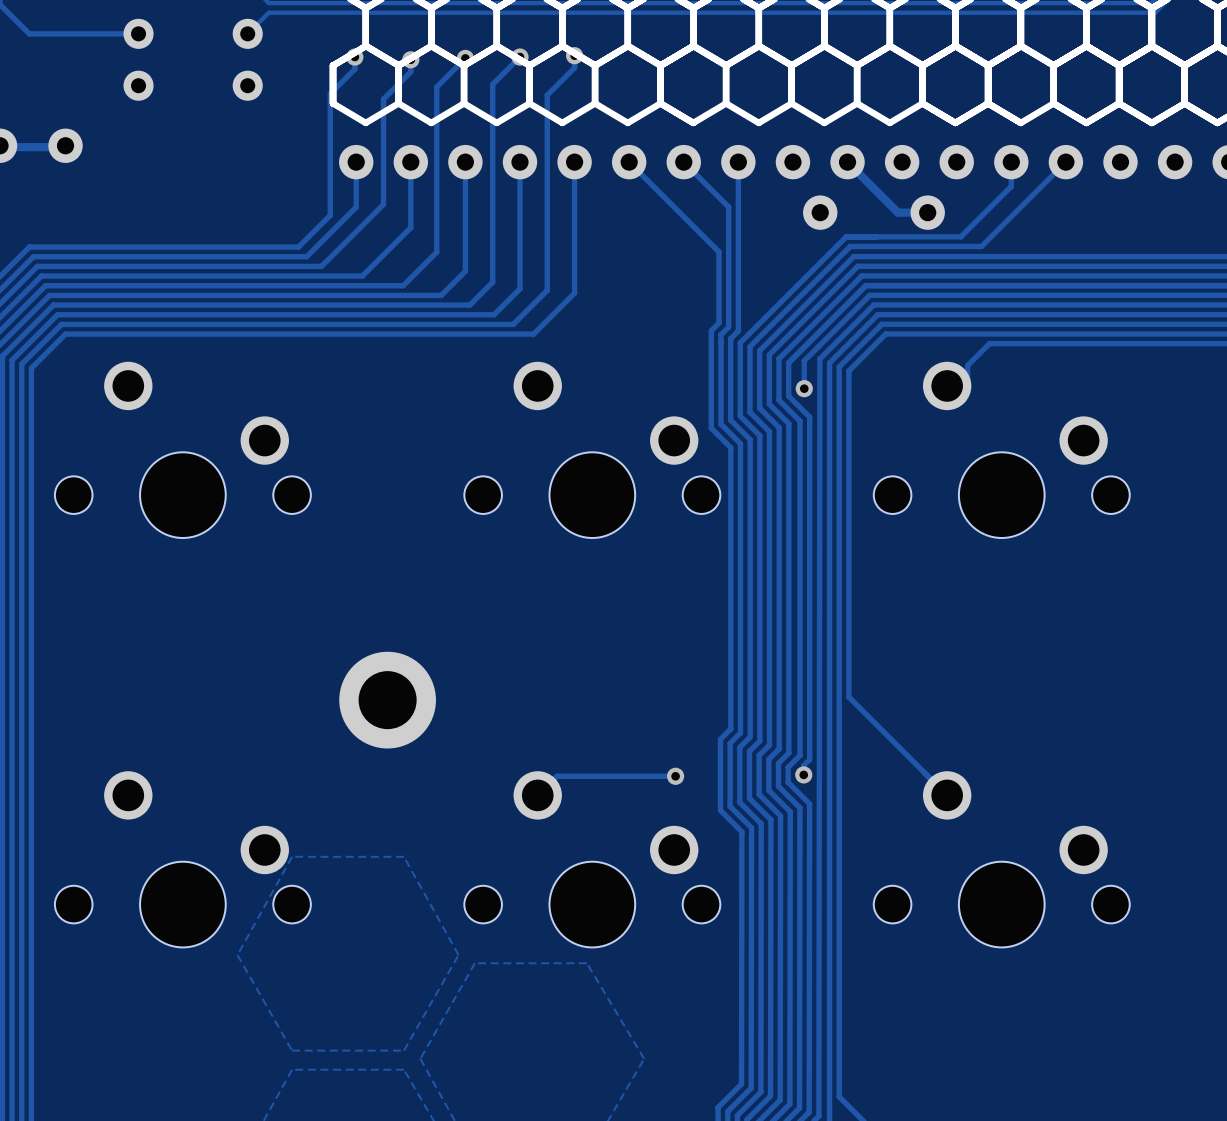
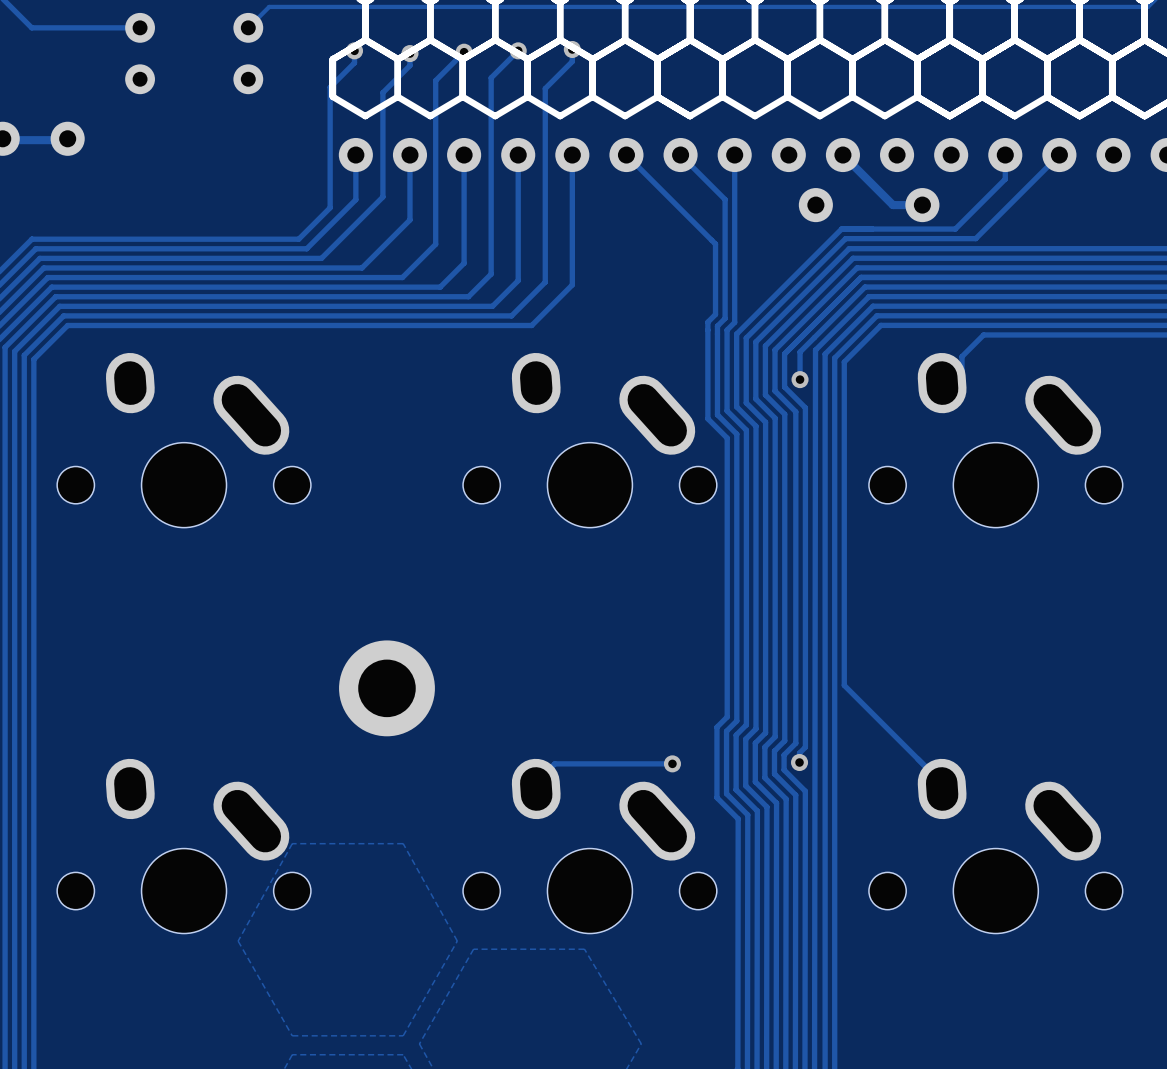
part footprint: [54, 361, 311, 538] -> [57, 352, 311, 528]
part footprint: [464, 361, 721, 538] -> [463, 352, 717, 528]
part footprint: [873, 361, 1130, 538] -> [868, 352, 1123, 528]
part footprint: [54, 771, 311, 948] -> [57, 758, 311, 934]
part footprint: [464, 771, 721, 948] -> [463, 758, 717, 934]
part footprint: [873, 771, 1130, 948] -> [868, 758, 1123, 934]

